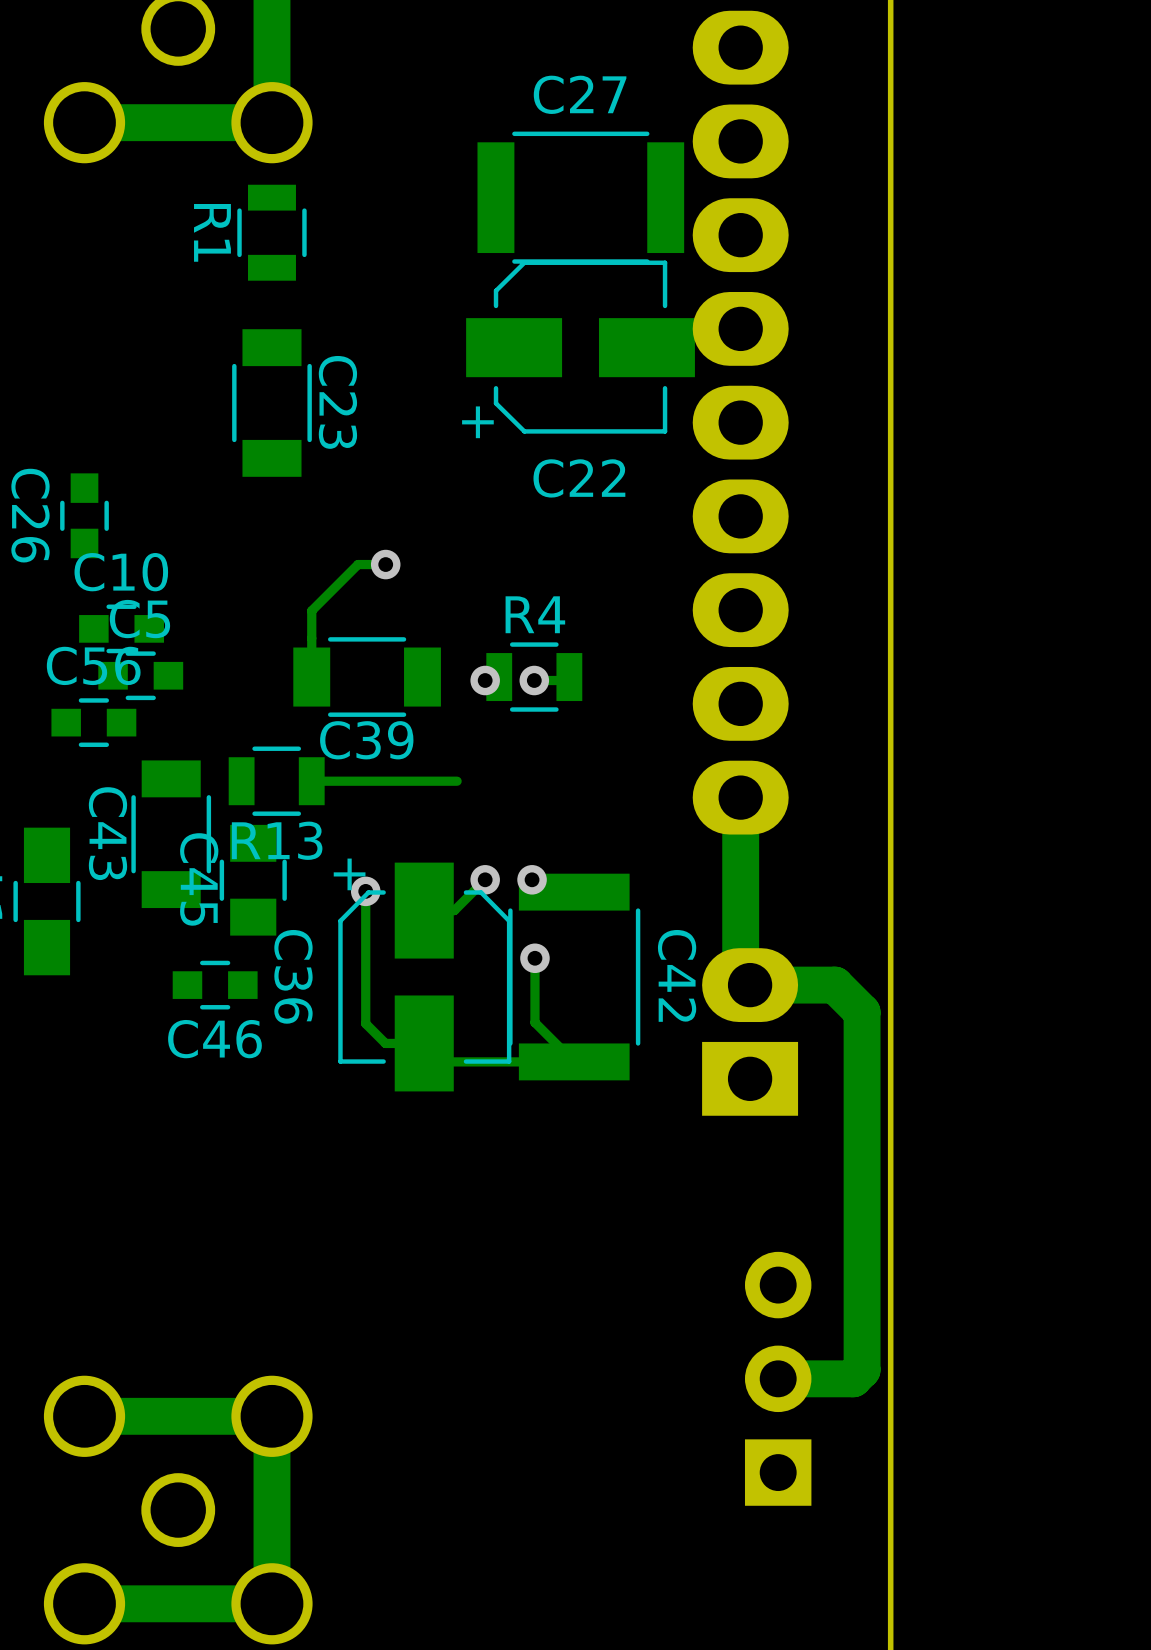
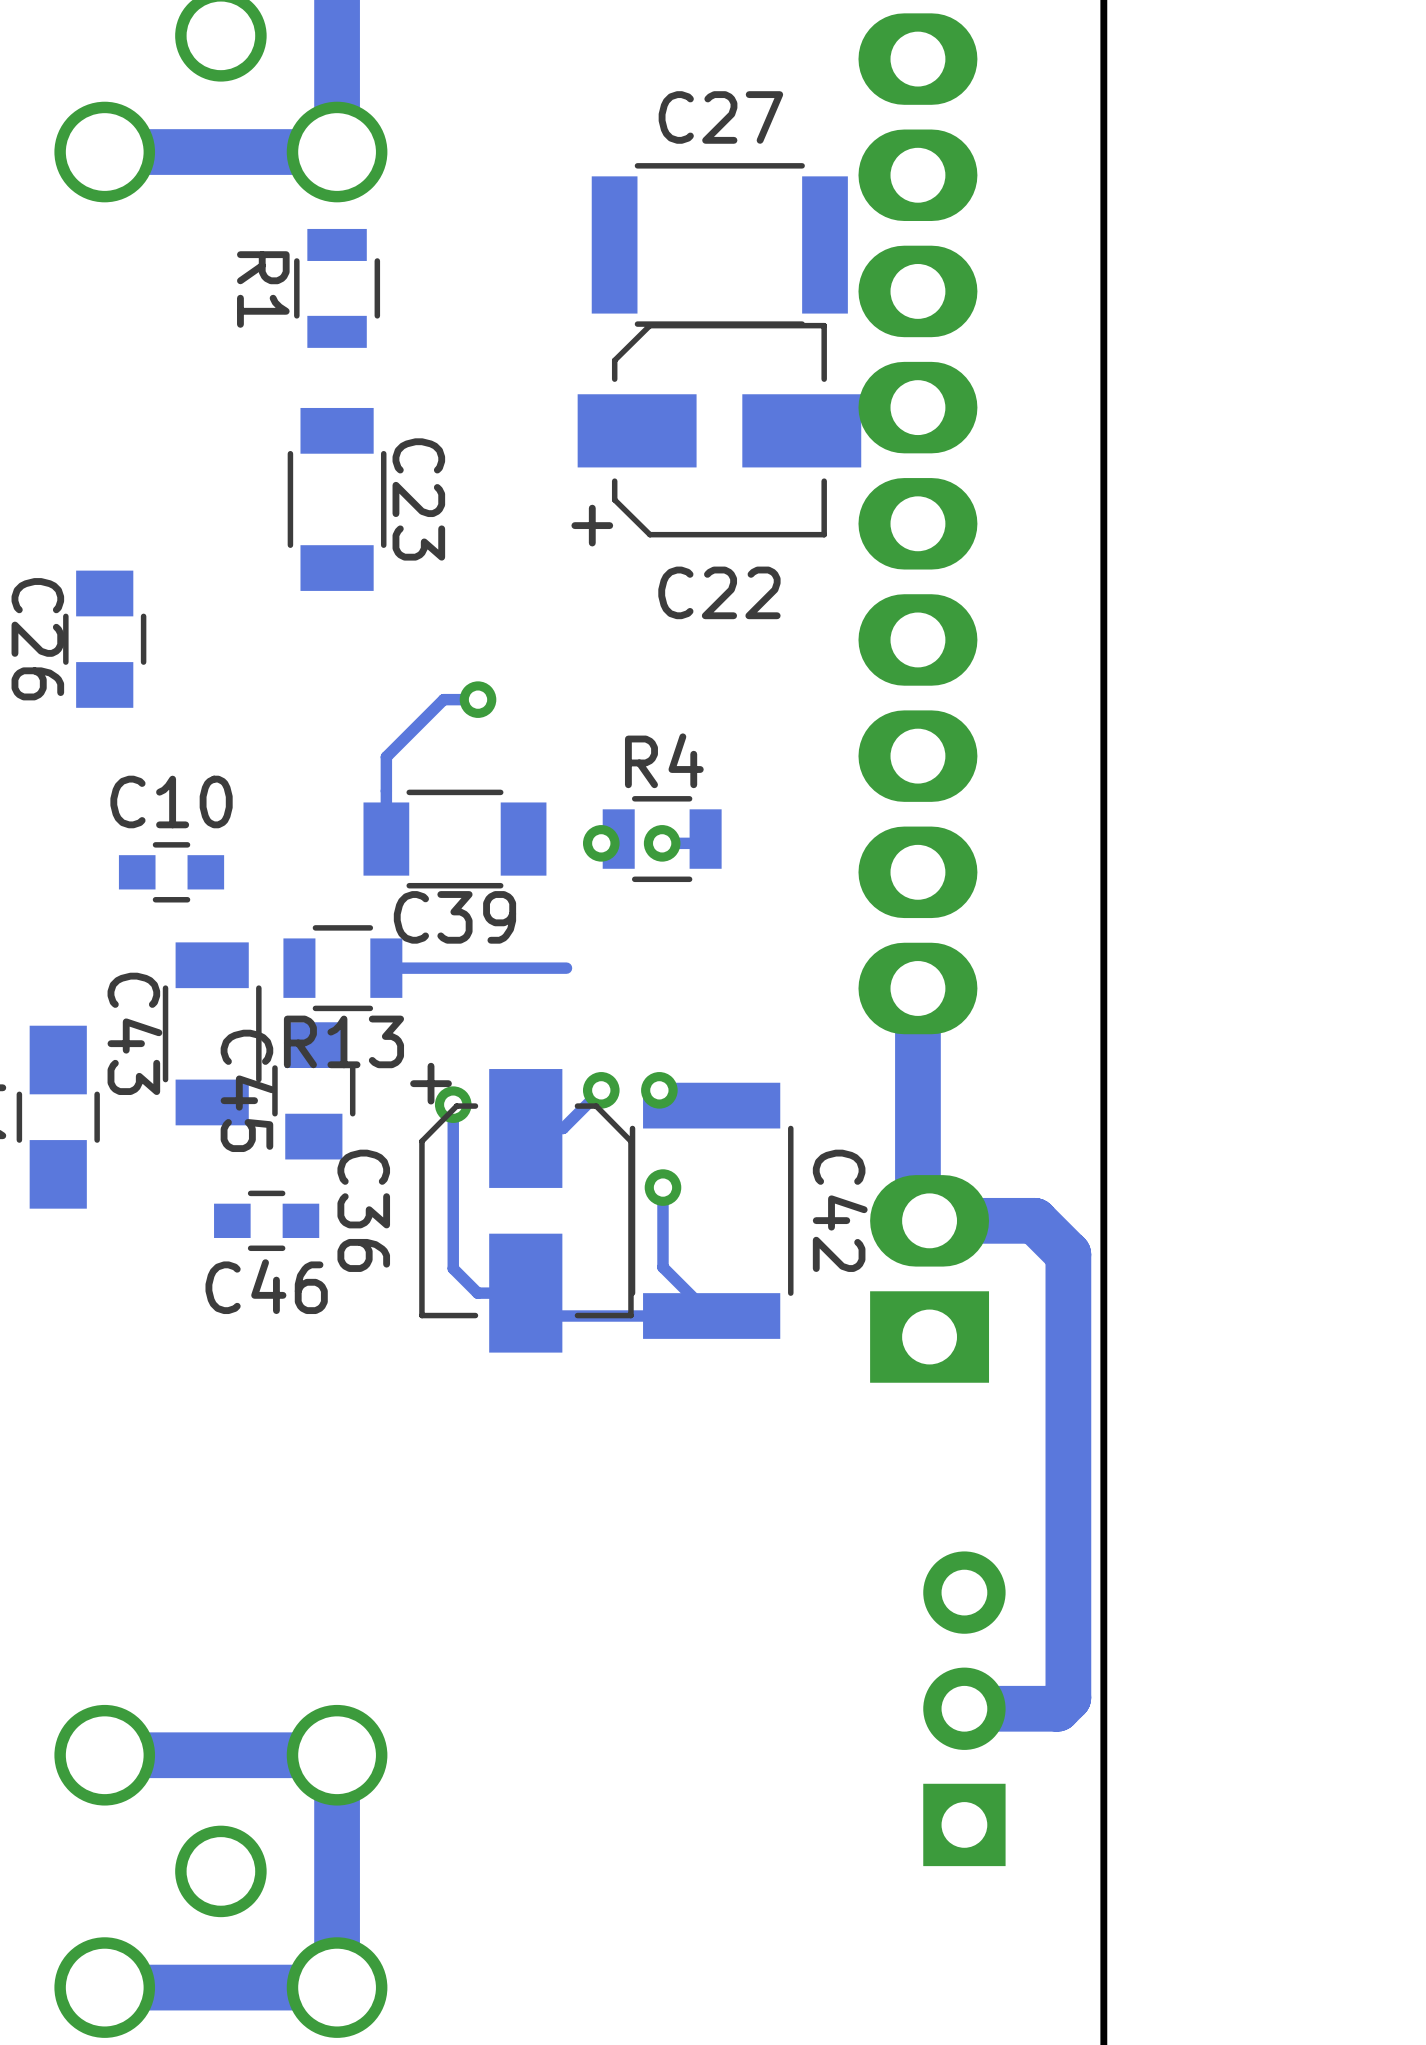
C26 footprint: [60, 473, 109, 559] -> [63, 570, 147, 708]
C10 position: (121, 628) -> (171, 872)
C5: (140, 675) -> none
C56: (93, 722) -> none

